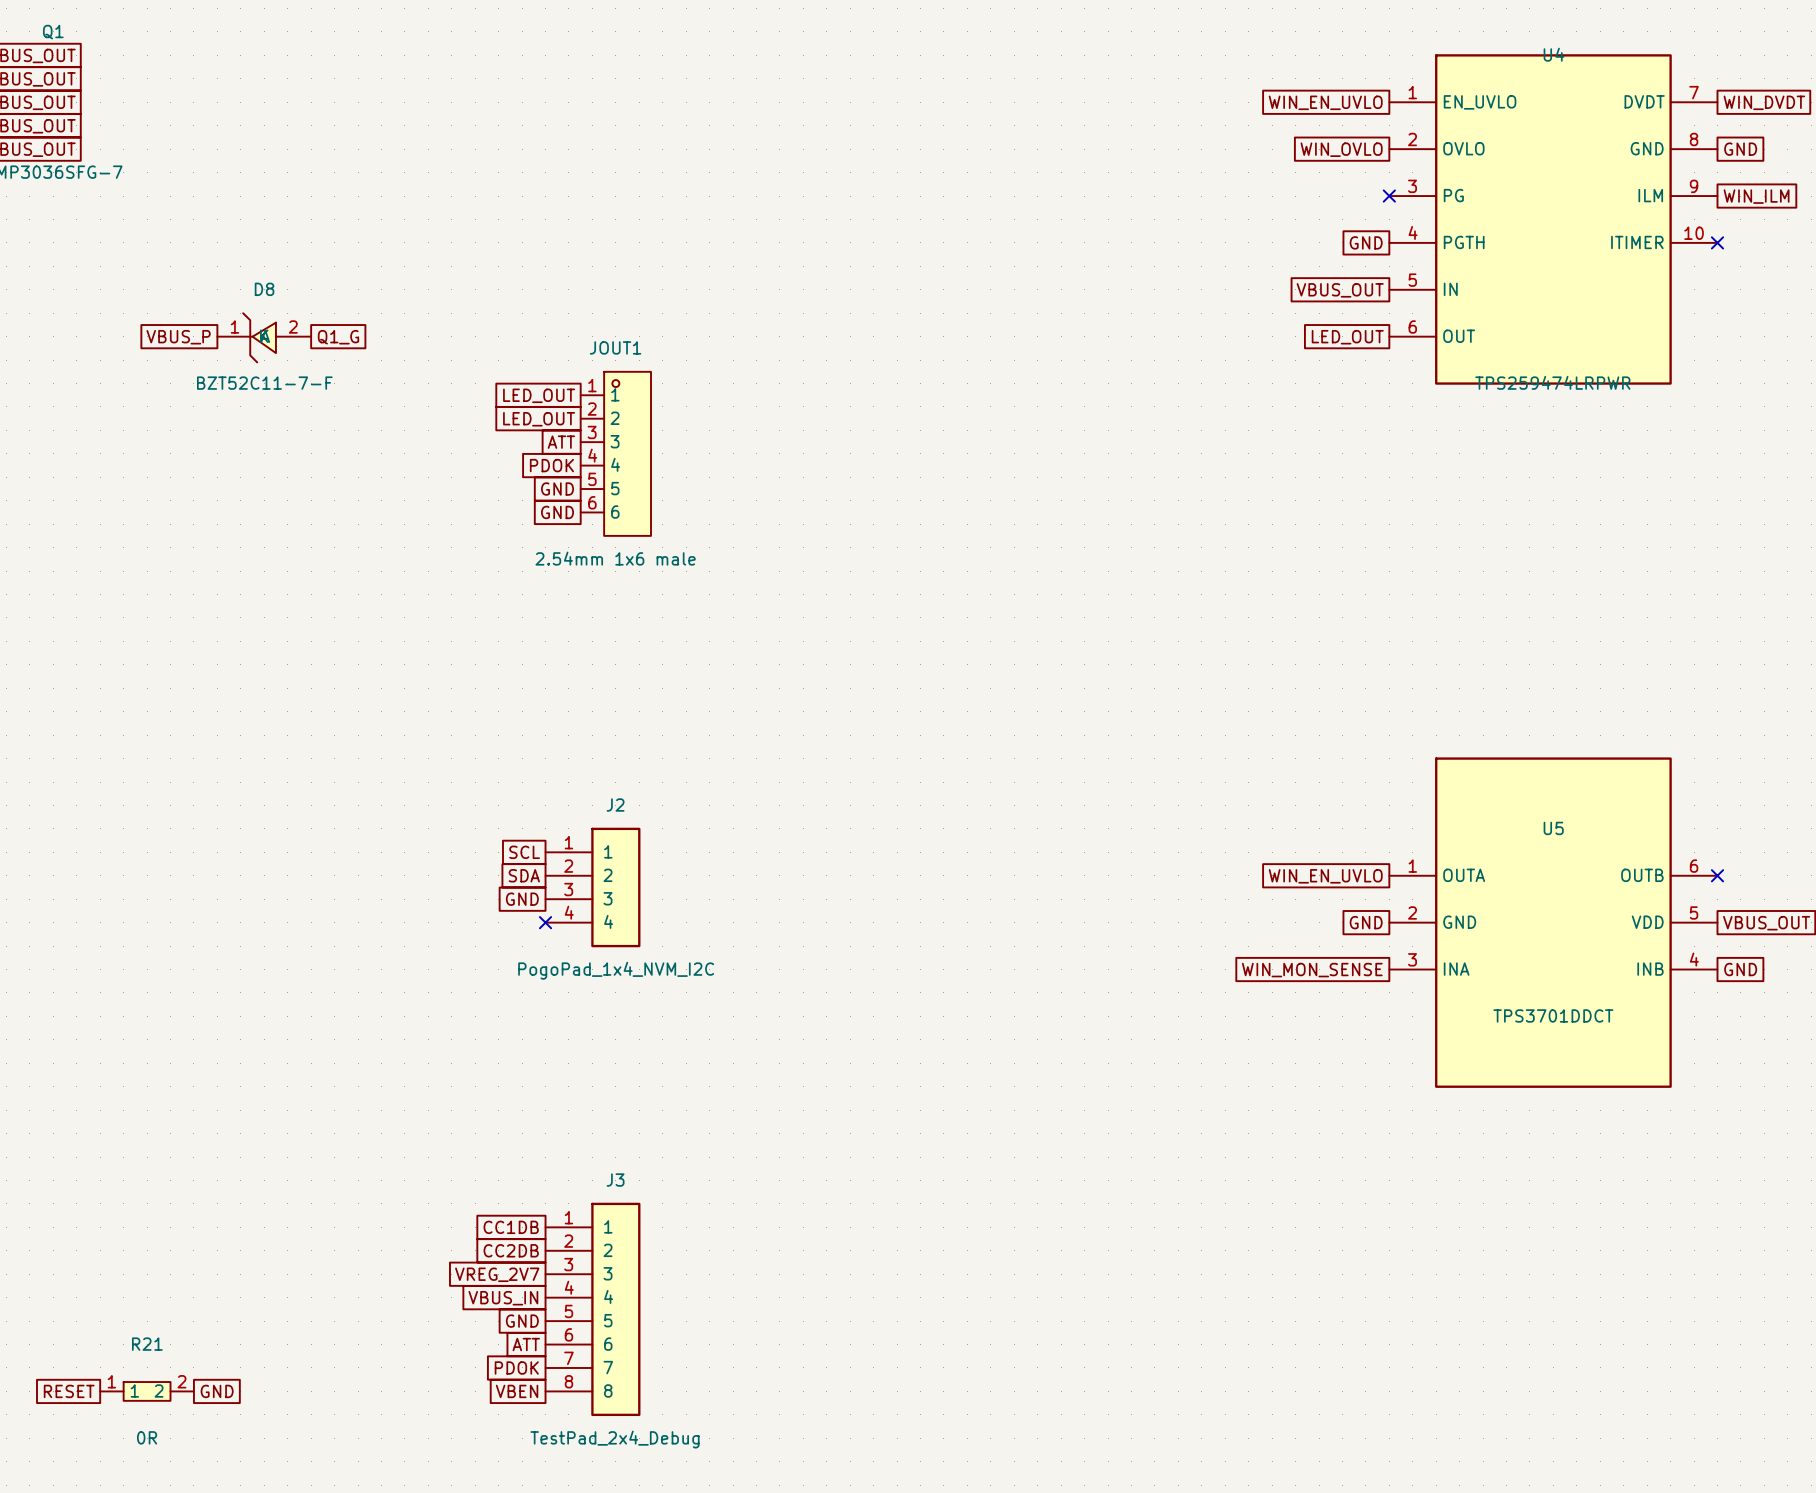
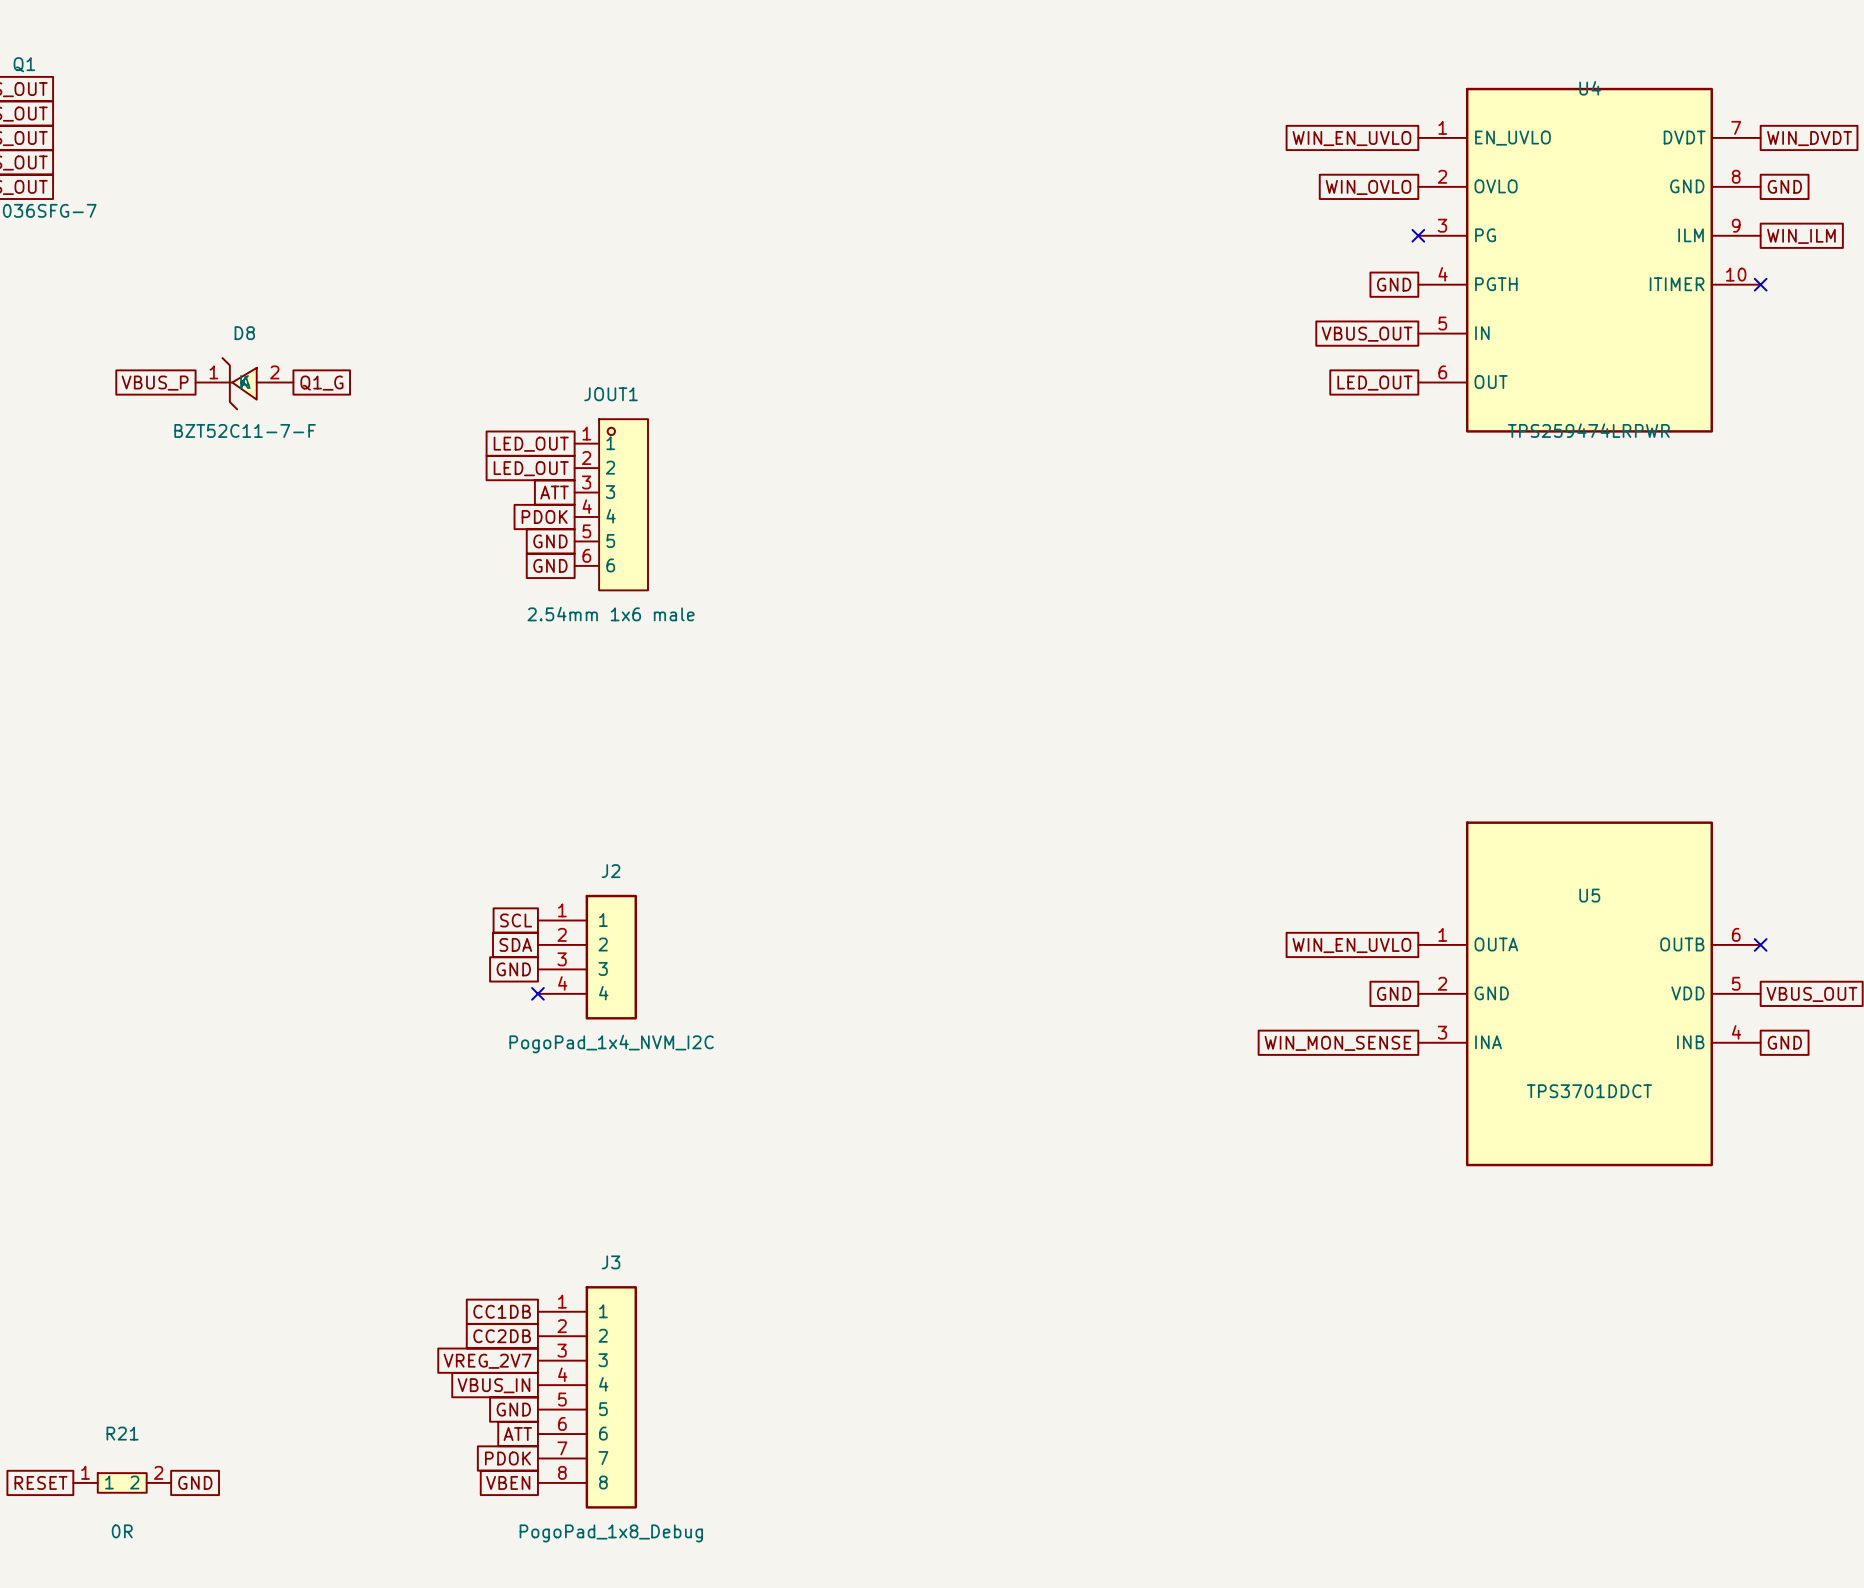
J3 value: TestPad_2x4_Debug (615, 1439) -> PogoPad_1x8_Debug (611, 1533)

